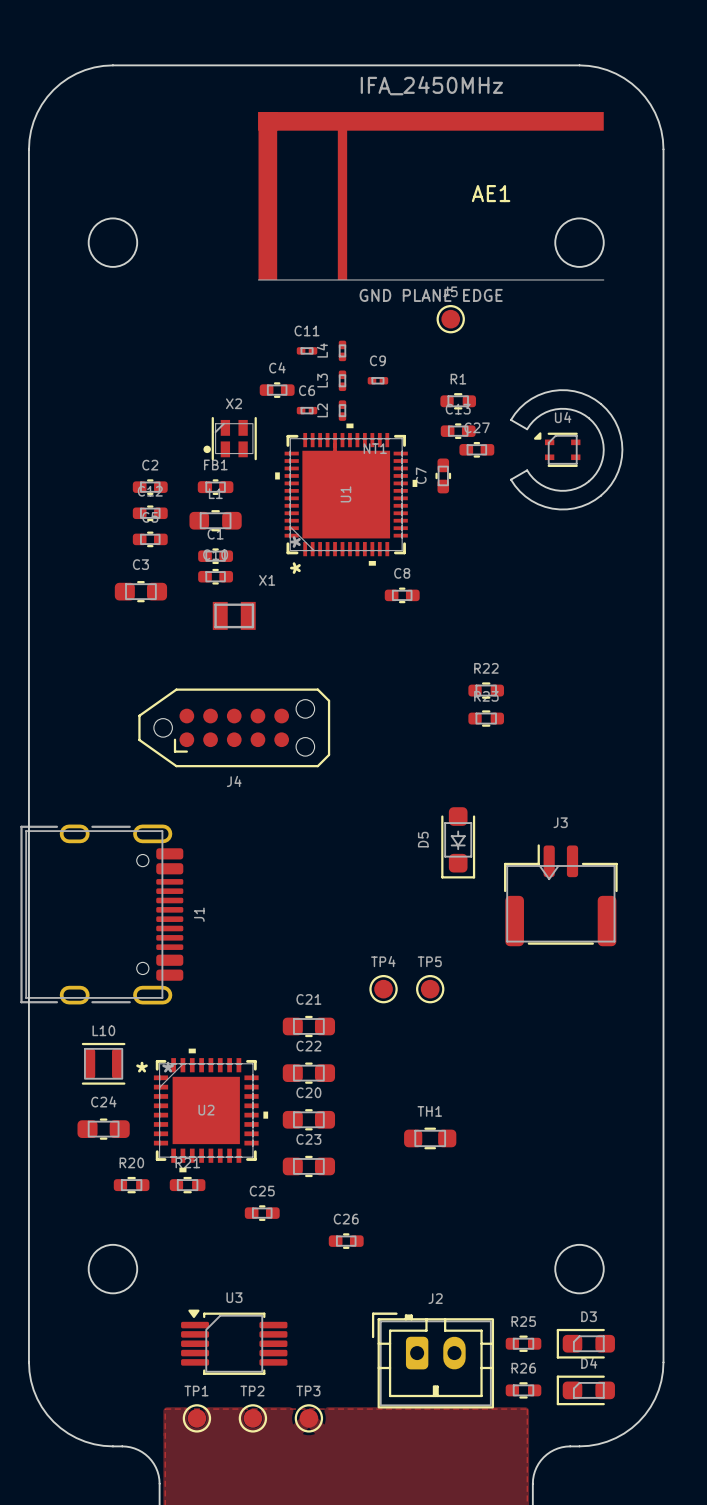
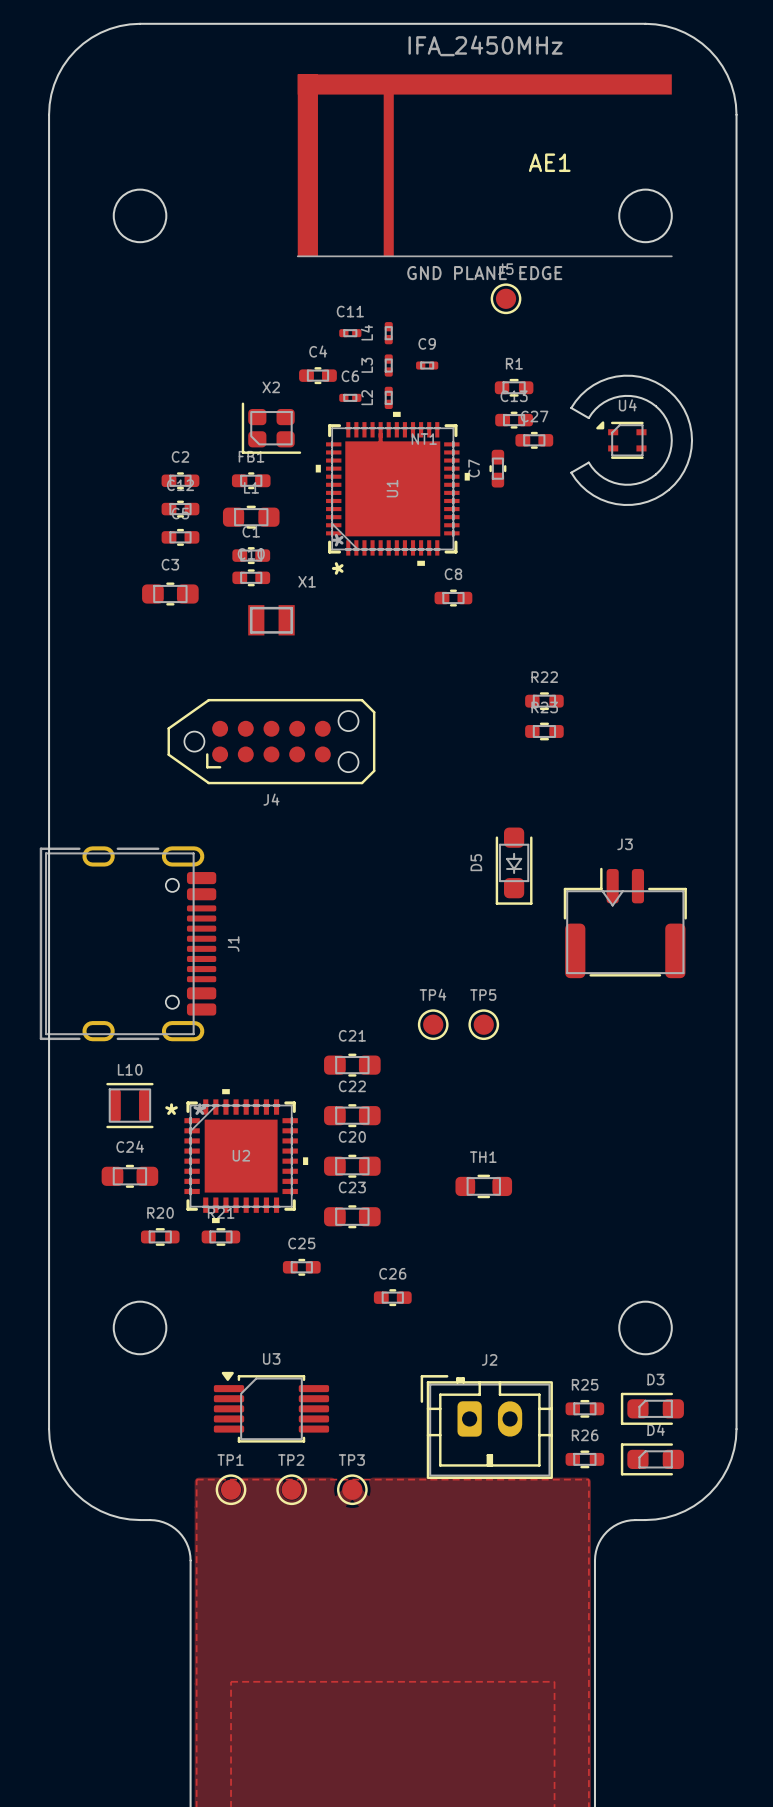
X2 footprint: [203, 416, 257, 461] -> [241, 402, 302, 454]

